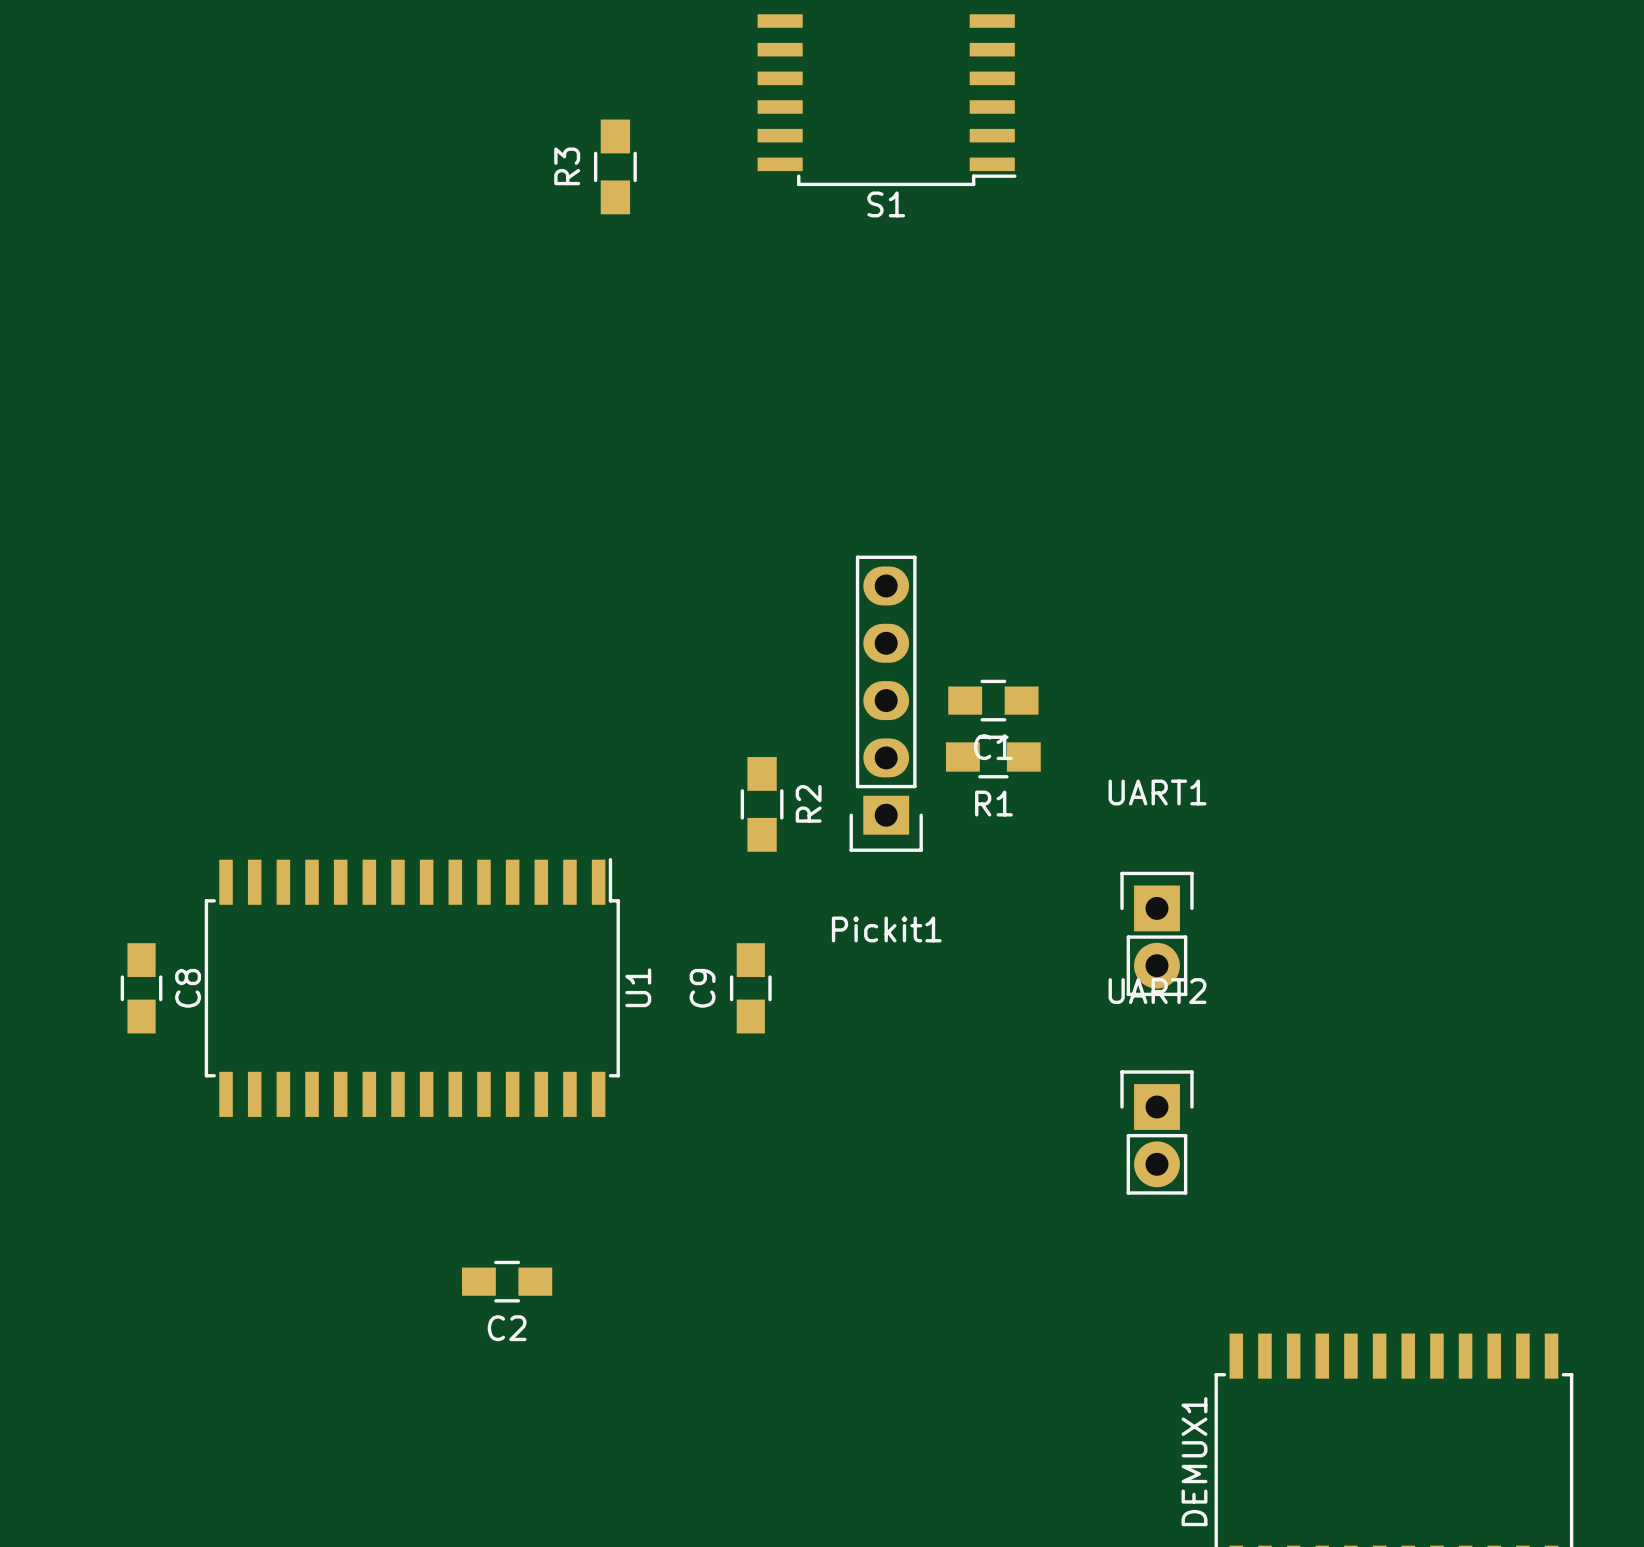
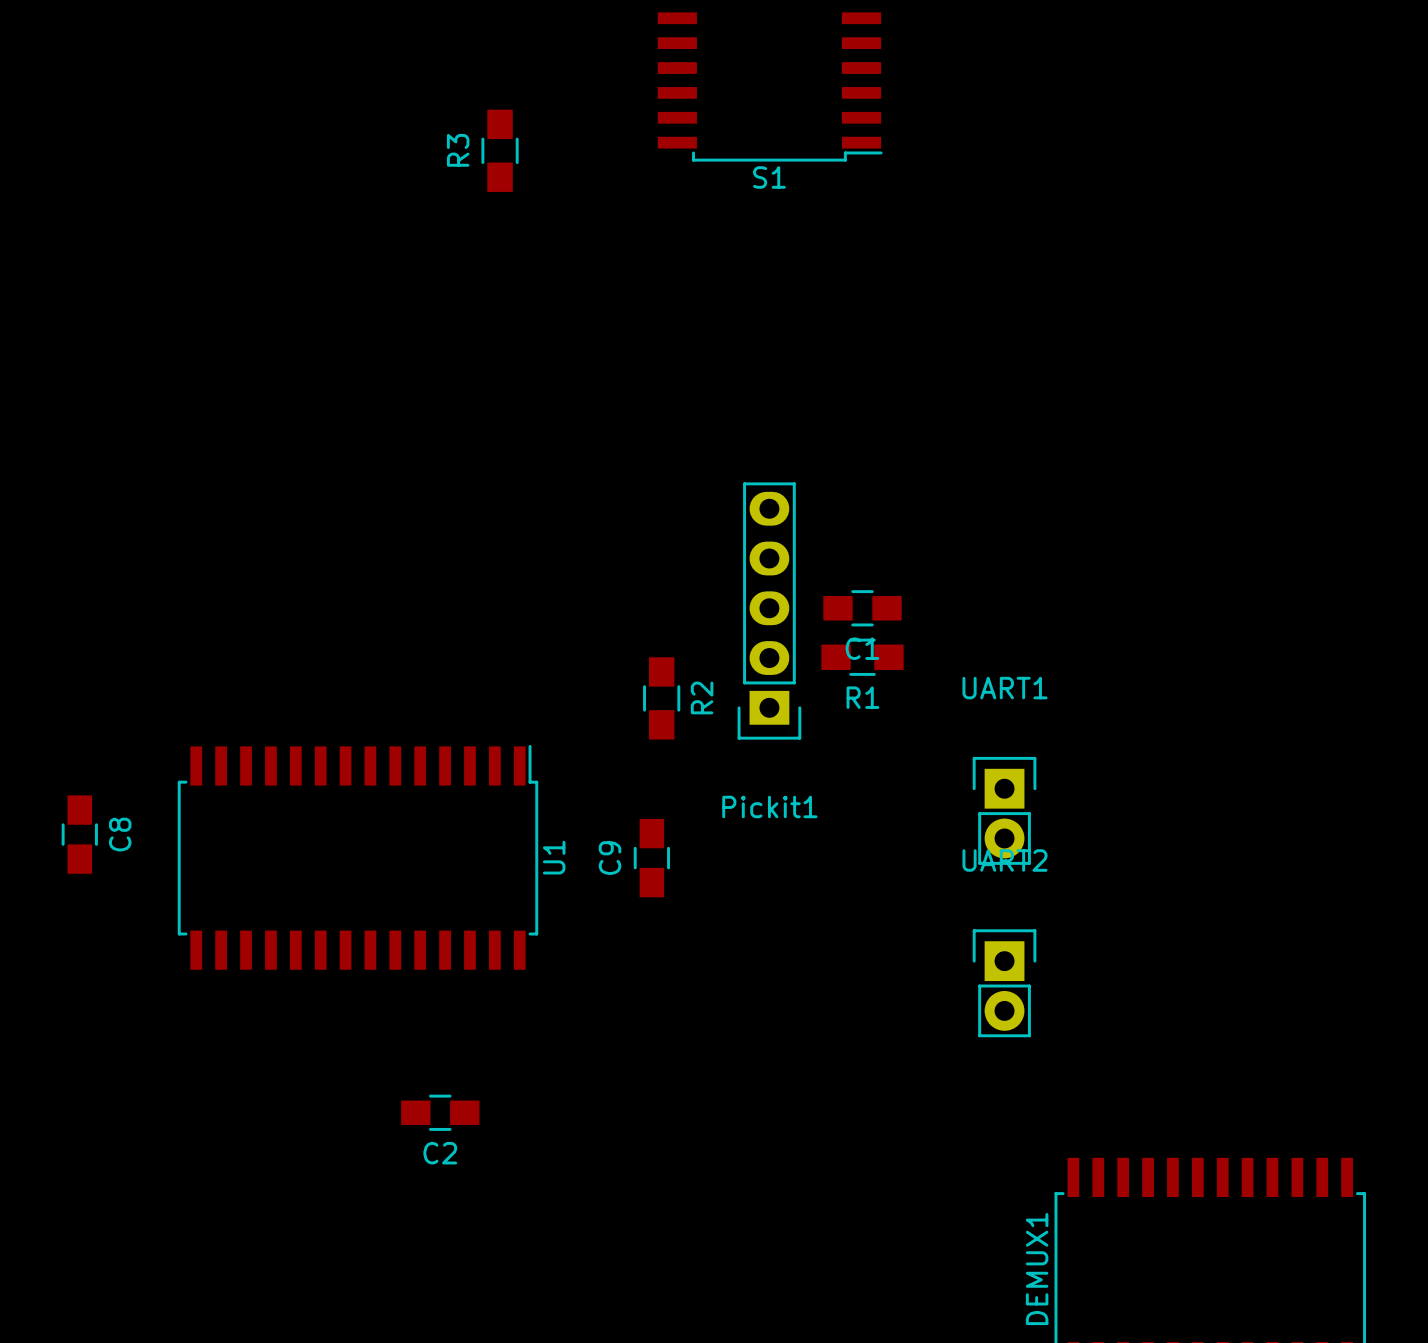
R3 position: (615, 166) -> (500, 150)
C8 position: (141, 988) -> (79, 834)

